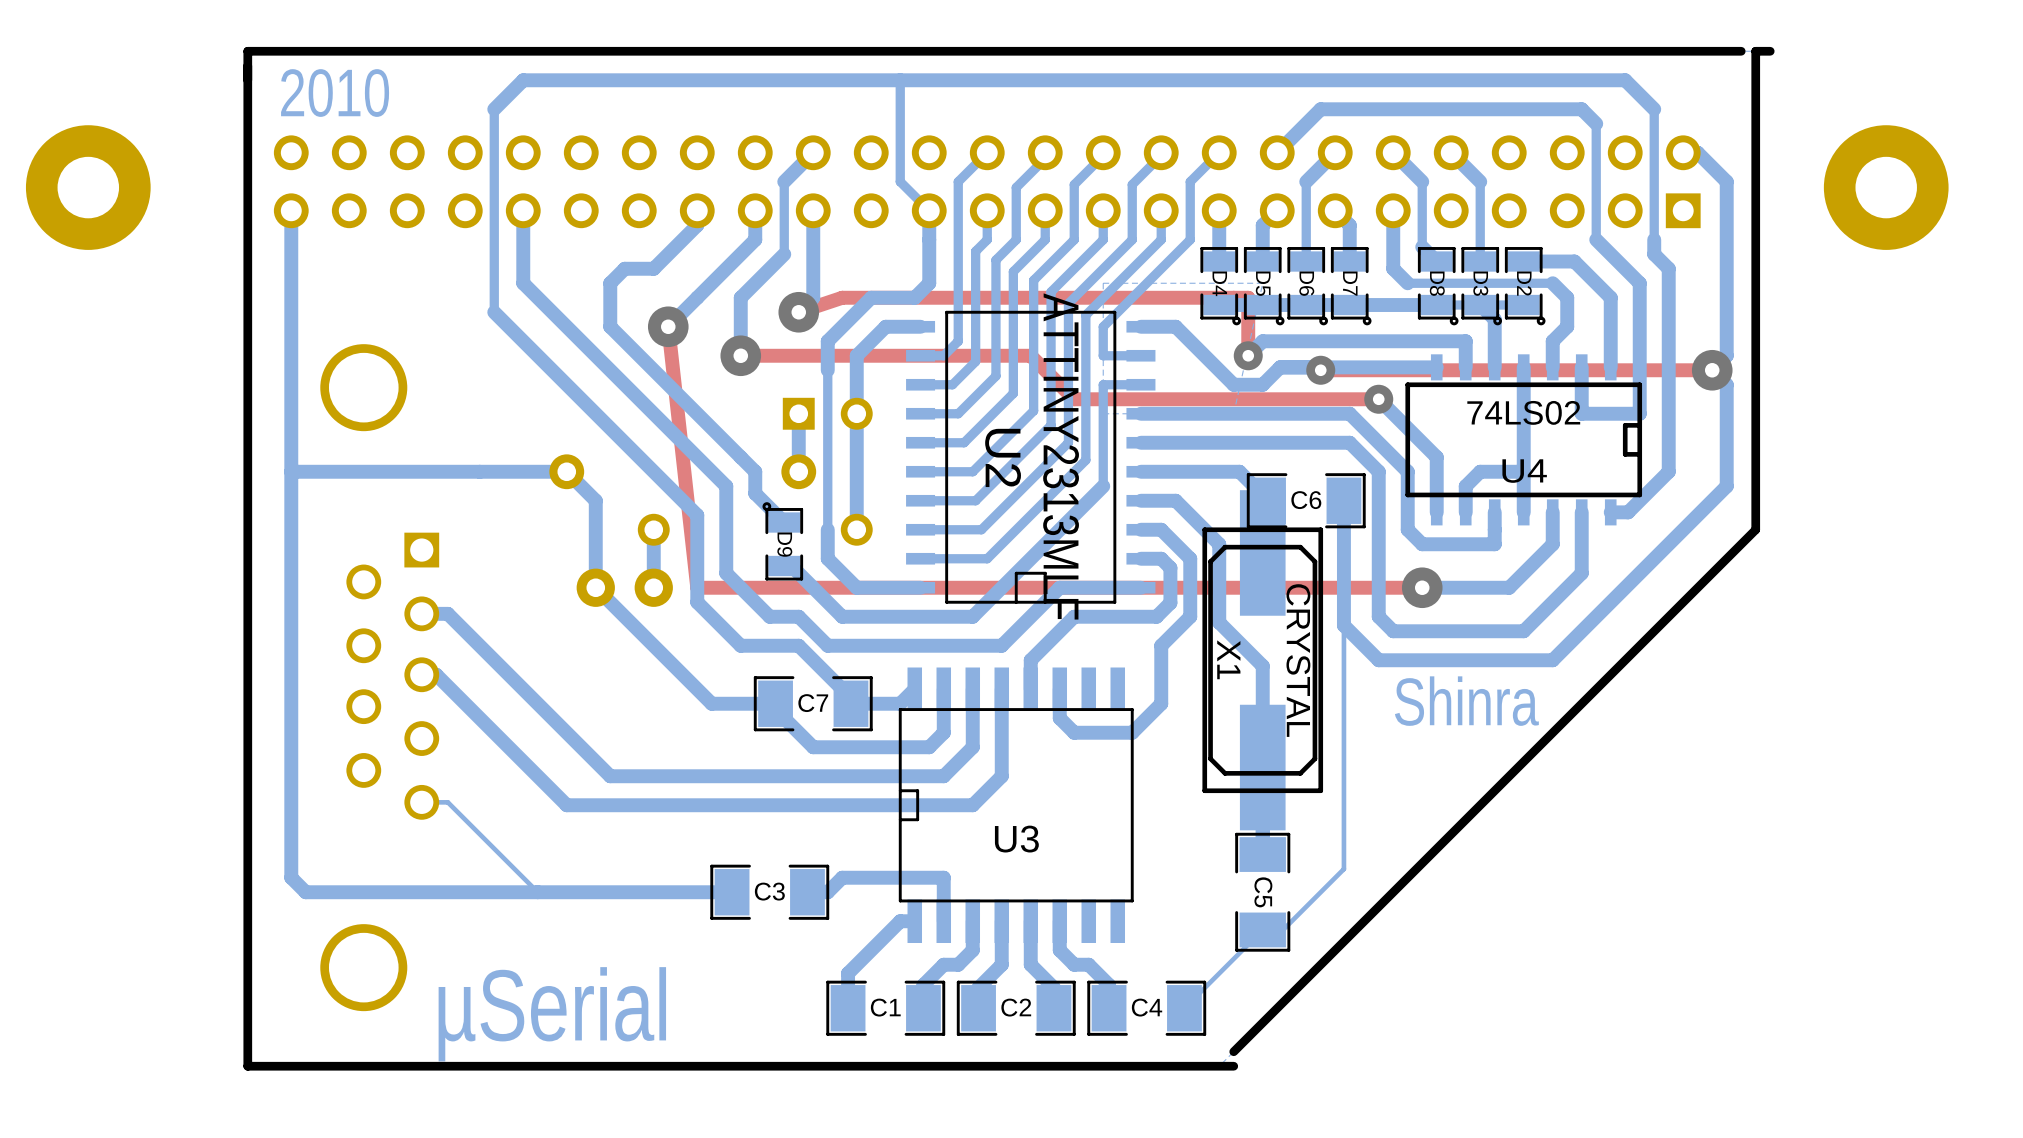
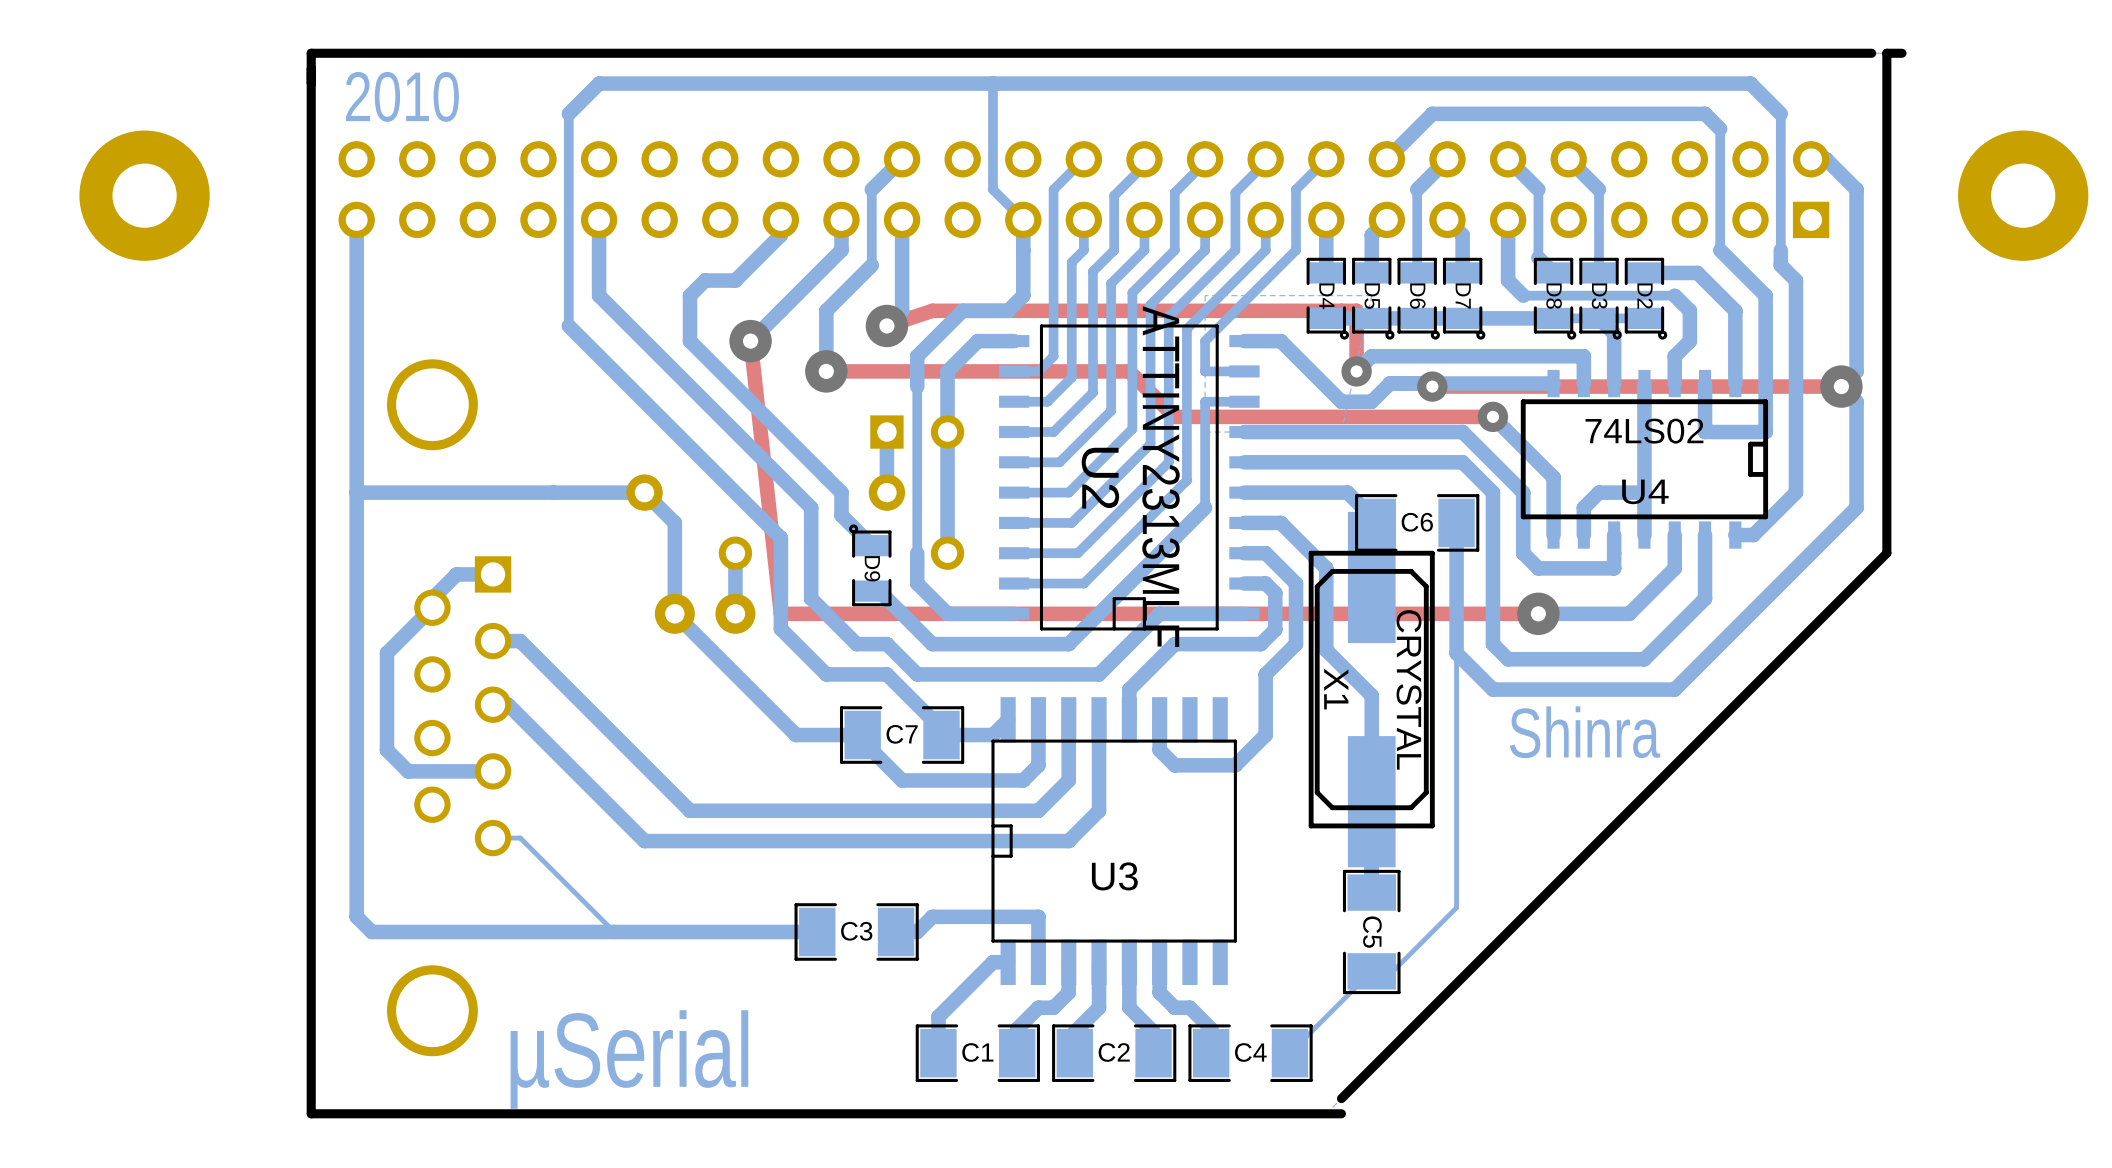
bottom track: none -> (493, 574) (456, 574) (432, 598) (432, 607) (386, 653) (386, 750) (408, 771) (493, 771)

